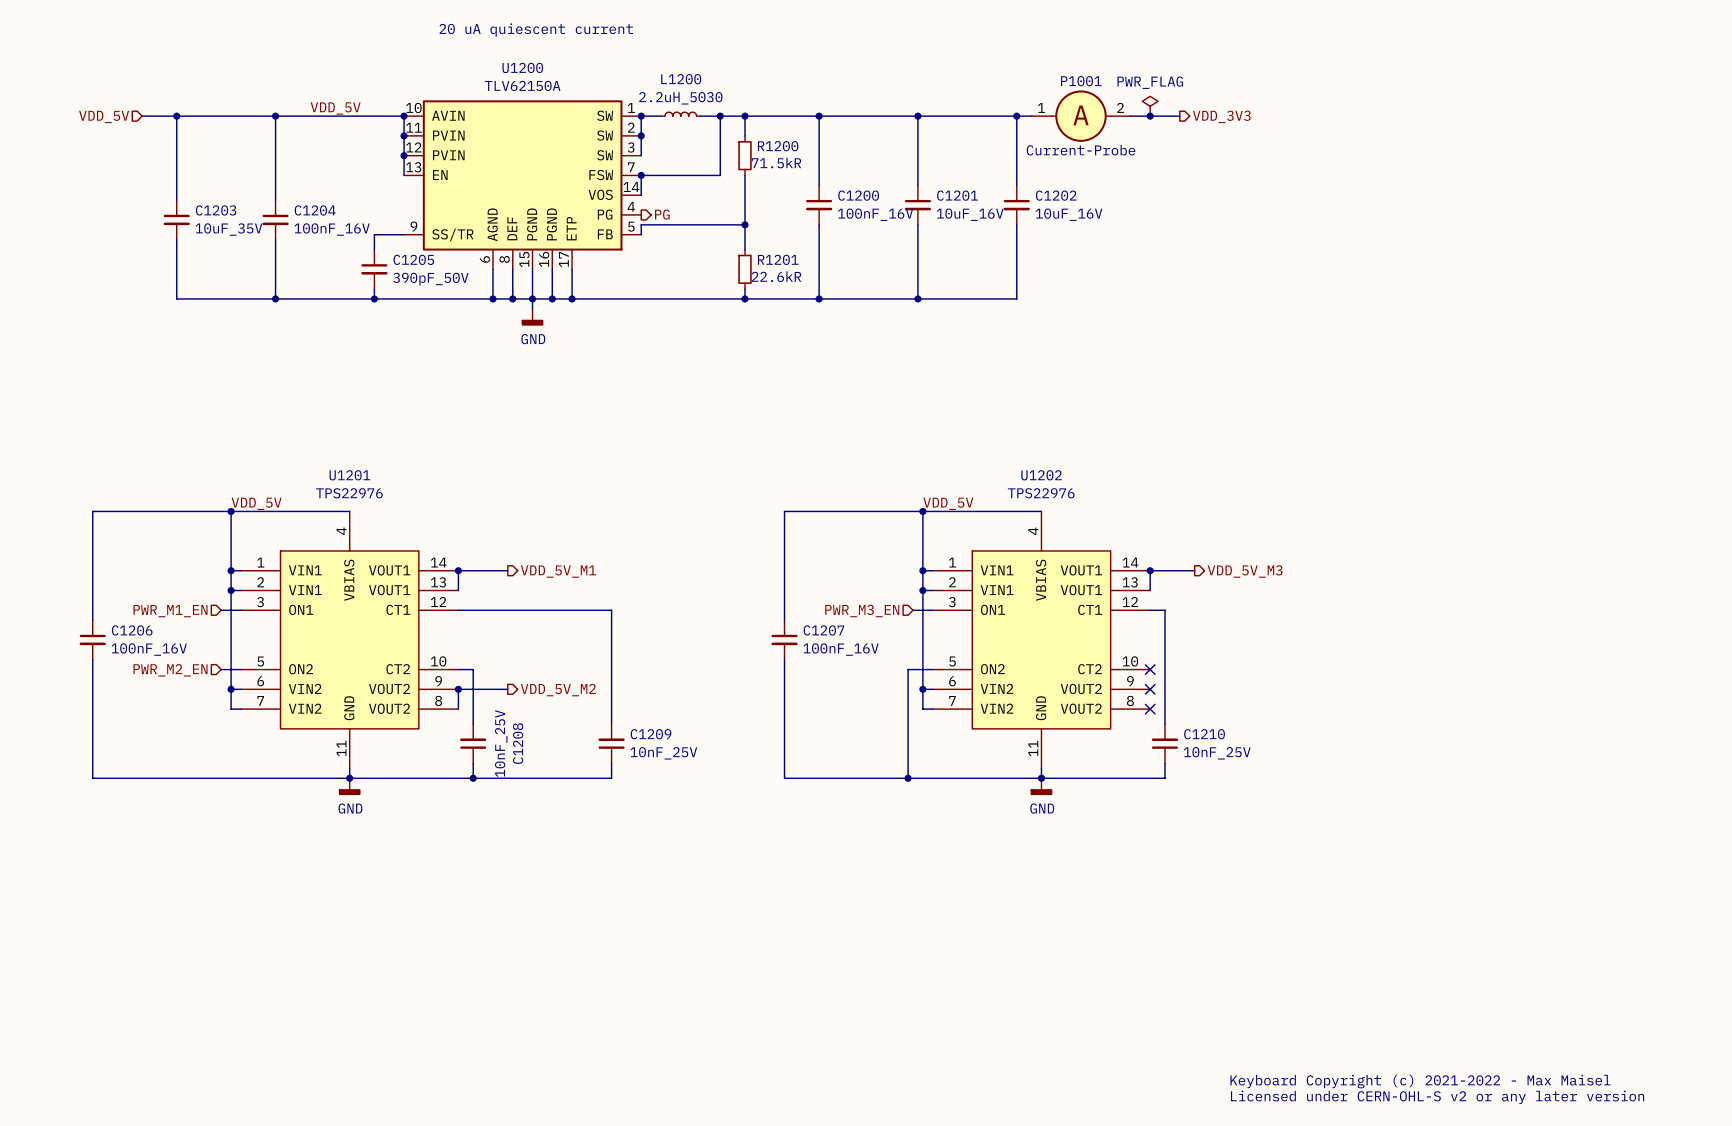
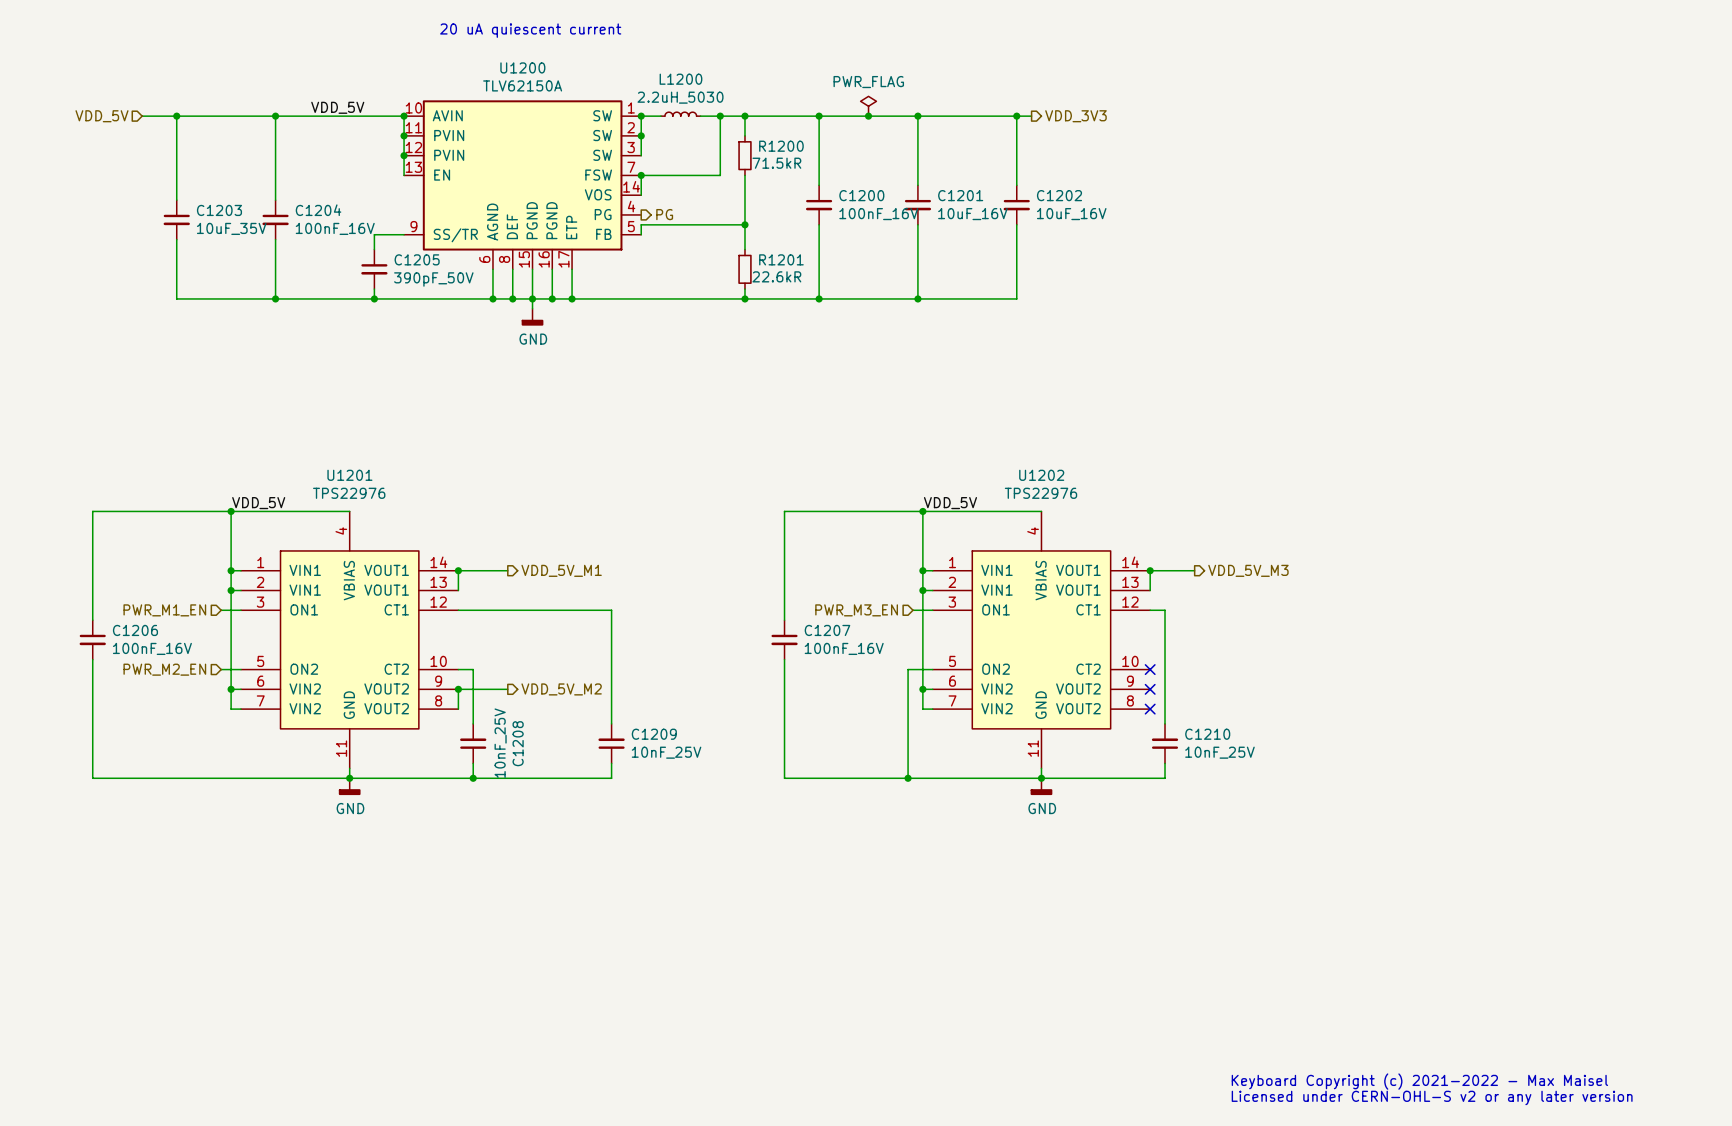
power symbol: none -> PWR_FLAG (868, 106)
power symbol: PWR_FLAG (1150, 106) -> none
junction: none -> (868, 116)
P1001: Current-Probe (1081, 116) -> none
wire: (1130, 116) (1179, 116) -> none
junction: (1150, 116) -> none
hierarchical label position: VDD_3V3 (1221, 116) -> VDD_3V3 (1075, 116)

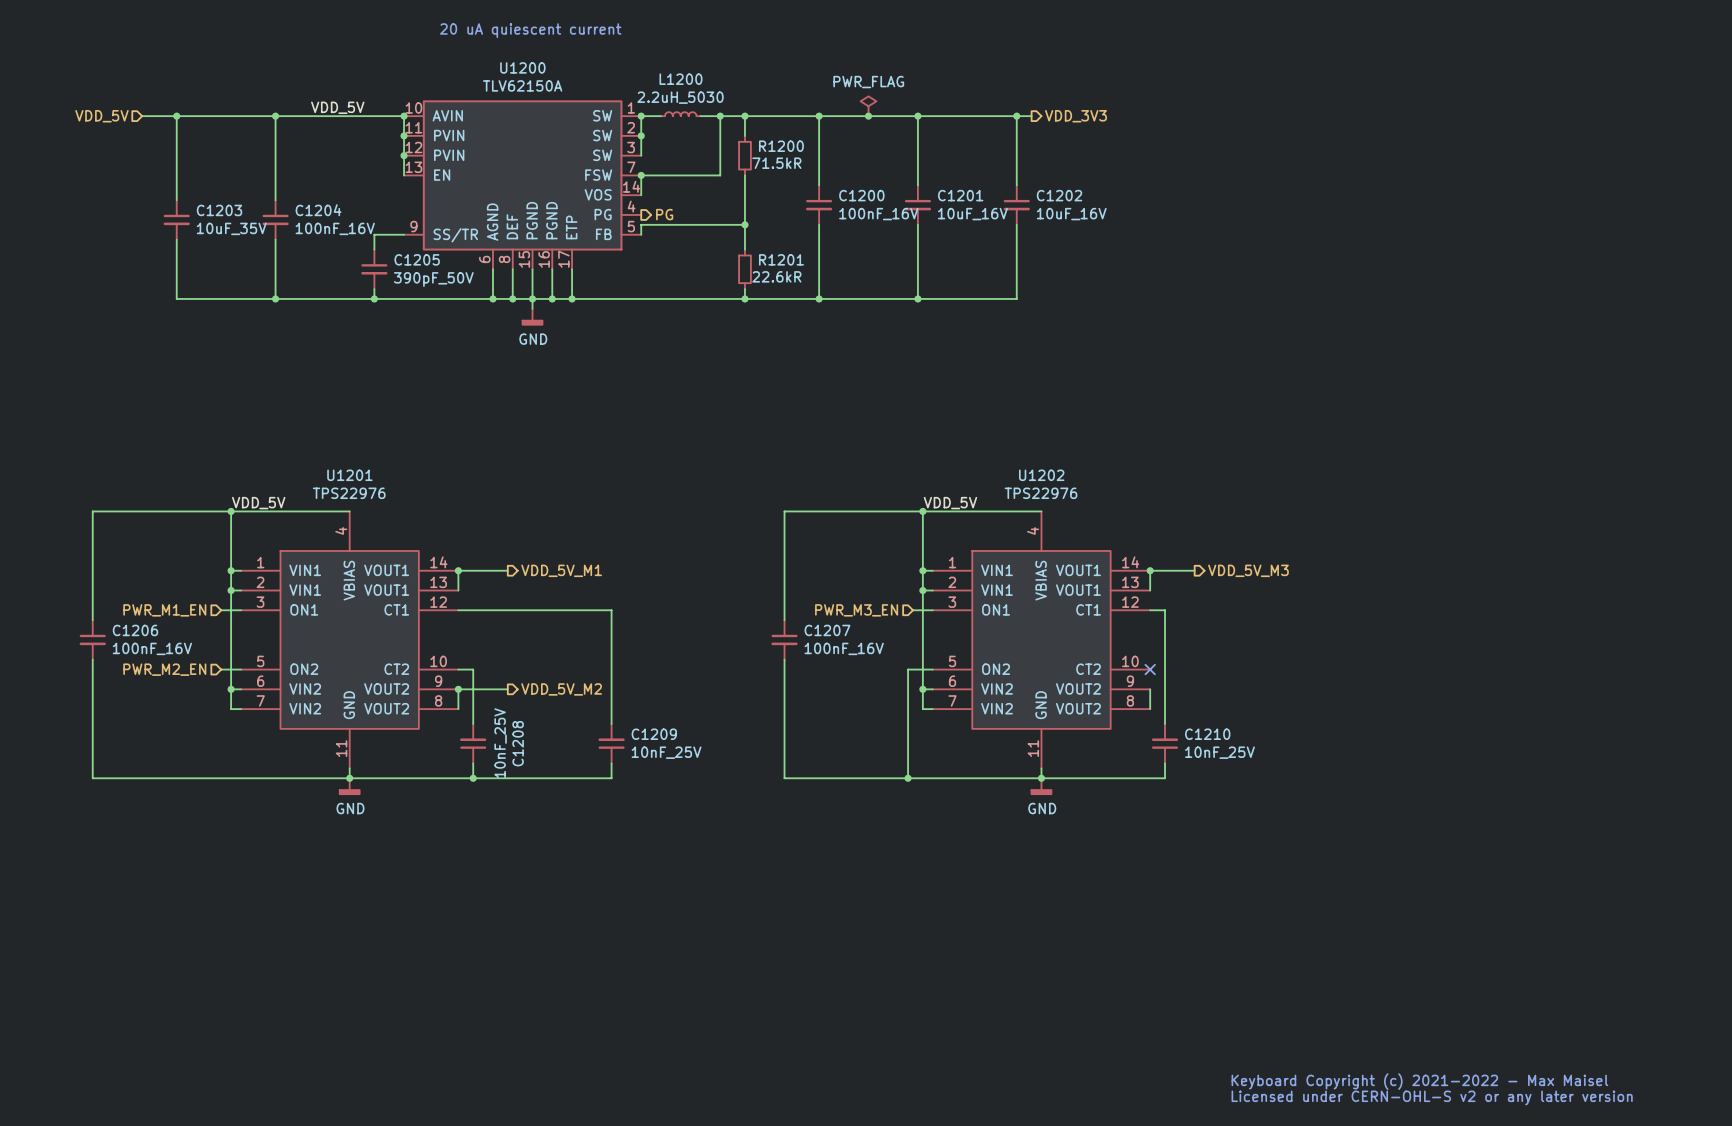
wire: none -> (1150, 689) (1150, 709)
no-connect mark: (1150, 689) -> none
no-connect mark: (1150, 709) -> none

